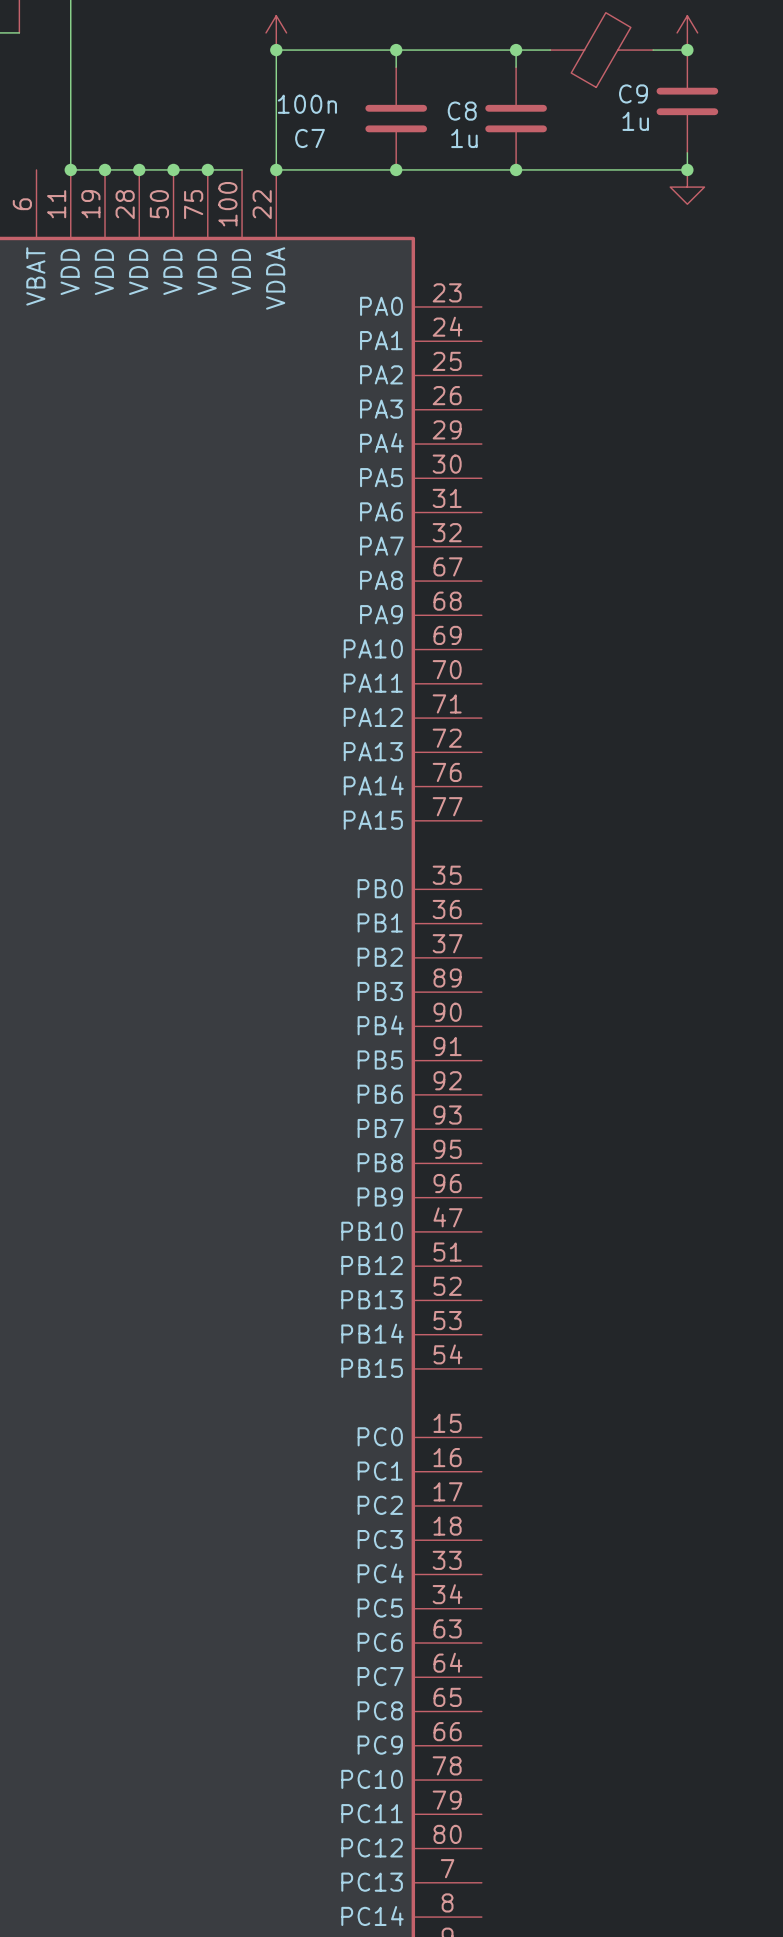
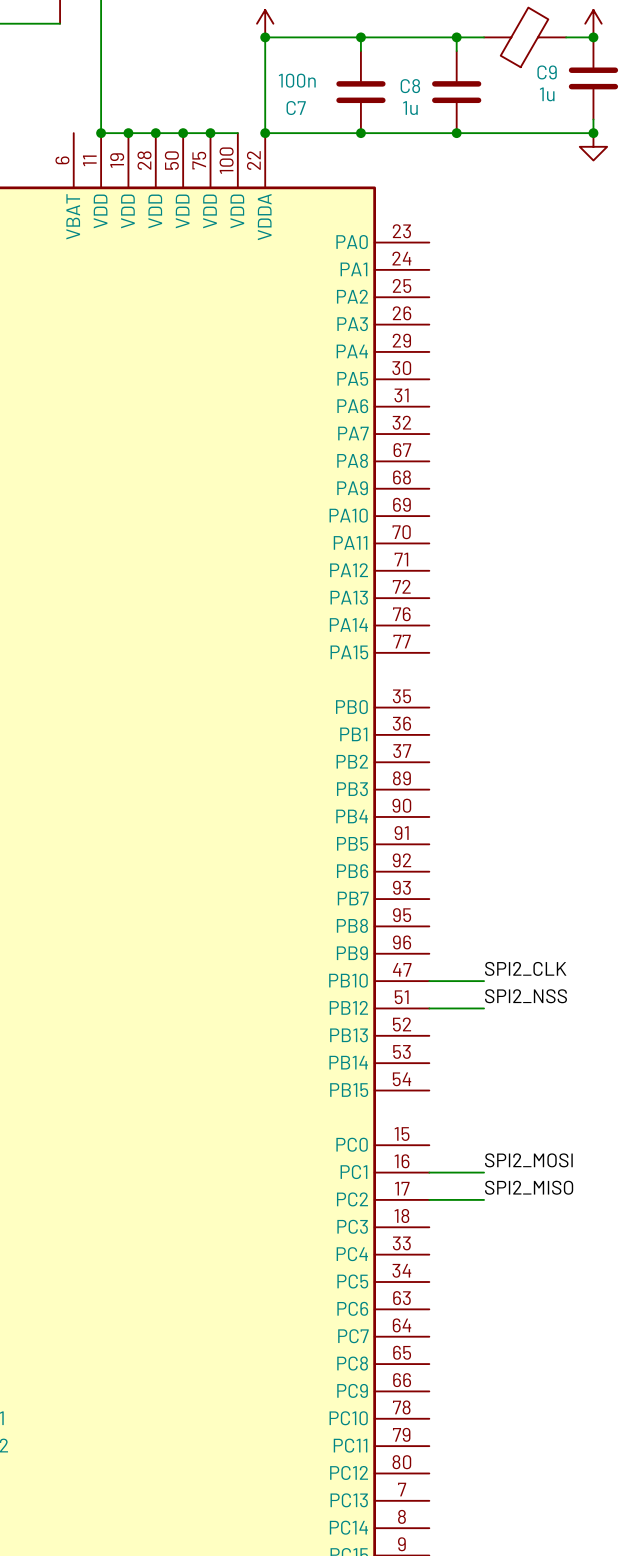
label: none -> SPI2_CLK (525, 968)
wire: none -> (429, 981) (484, 981)
label: none -> SPI2_NSS (526, 996)
wire: none -> (429, 1008) (484, 1008)
label: none -> SPI2_MOSI (528, 1160)
wire: none -> (429, 1172) (484, 1172)
label: none -> SPI2_MISO (529, 1187)
wire: none -> (429, 1199) (484, 1199)

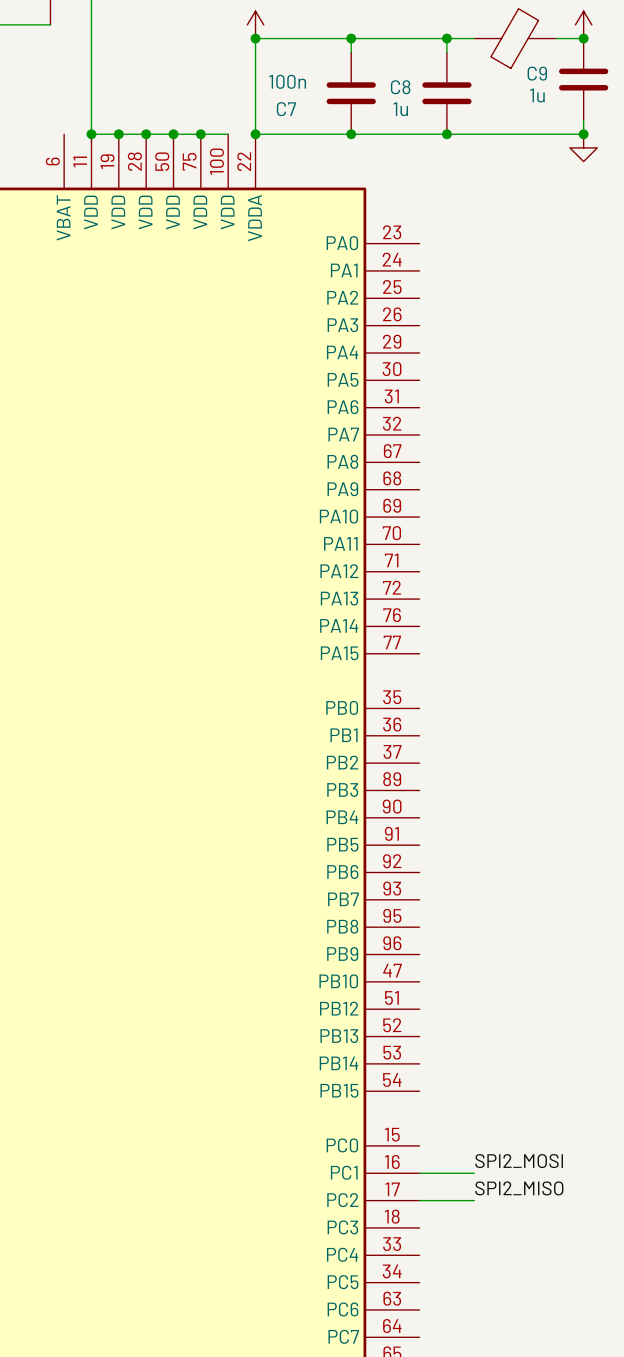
label: SPI2_CLK (525, 968) -> none
wire: (429, 981) (484, 981) -> none
label: SPI2_NSS (526, 996) -> none
wire: (429, 1008) (484, 1008) -> none

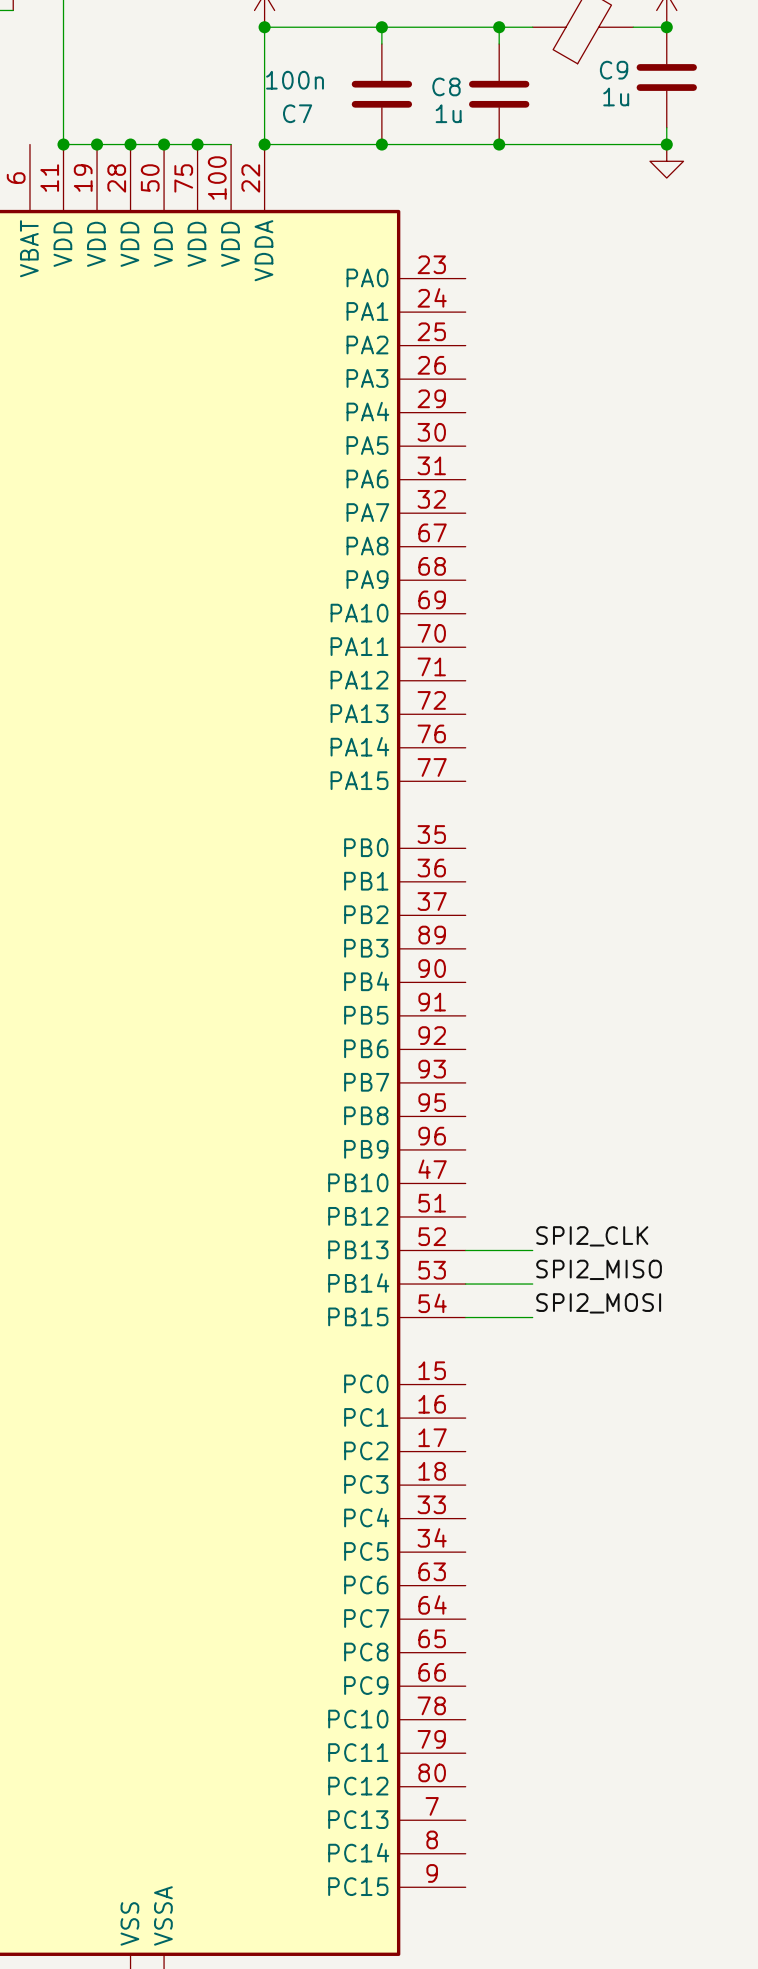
label: none -> SPI2_CLK (592, 1236)
wire: none -> (465, 1250) (532, 1250)
label position: SPI2_MOSI (519, 1161) -> SPI2_MOSI (598, 1303)
wire: (419, 1173) (474, 1173) -> (465, 1317) (532, 1317)
label position: SPI2_MISO (519, 1188) -> SPI2_MISO (599, 1269)
wire: (419, 1200) (474, 1200) -> (465, 1284) (532, 1284)

